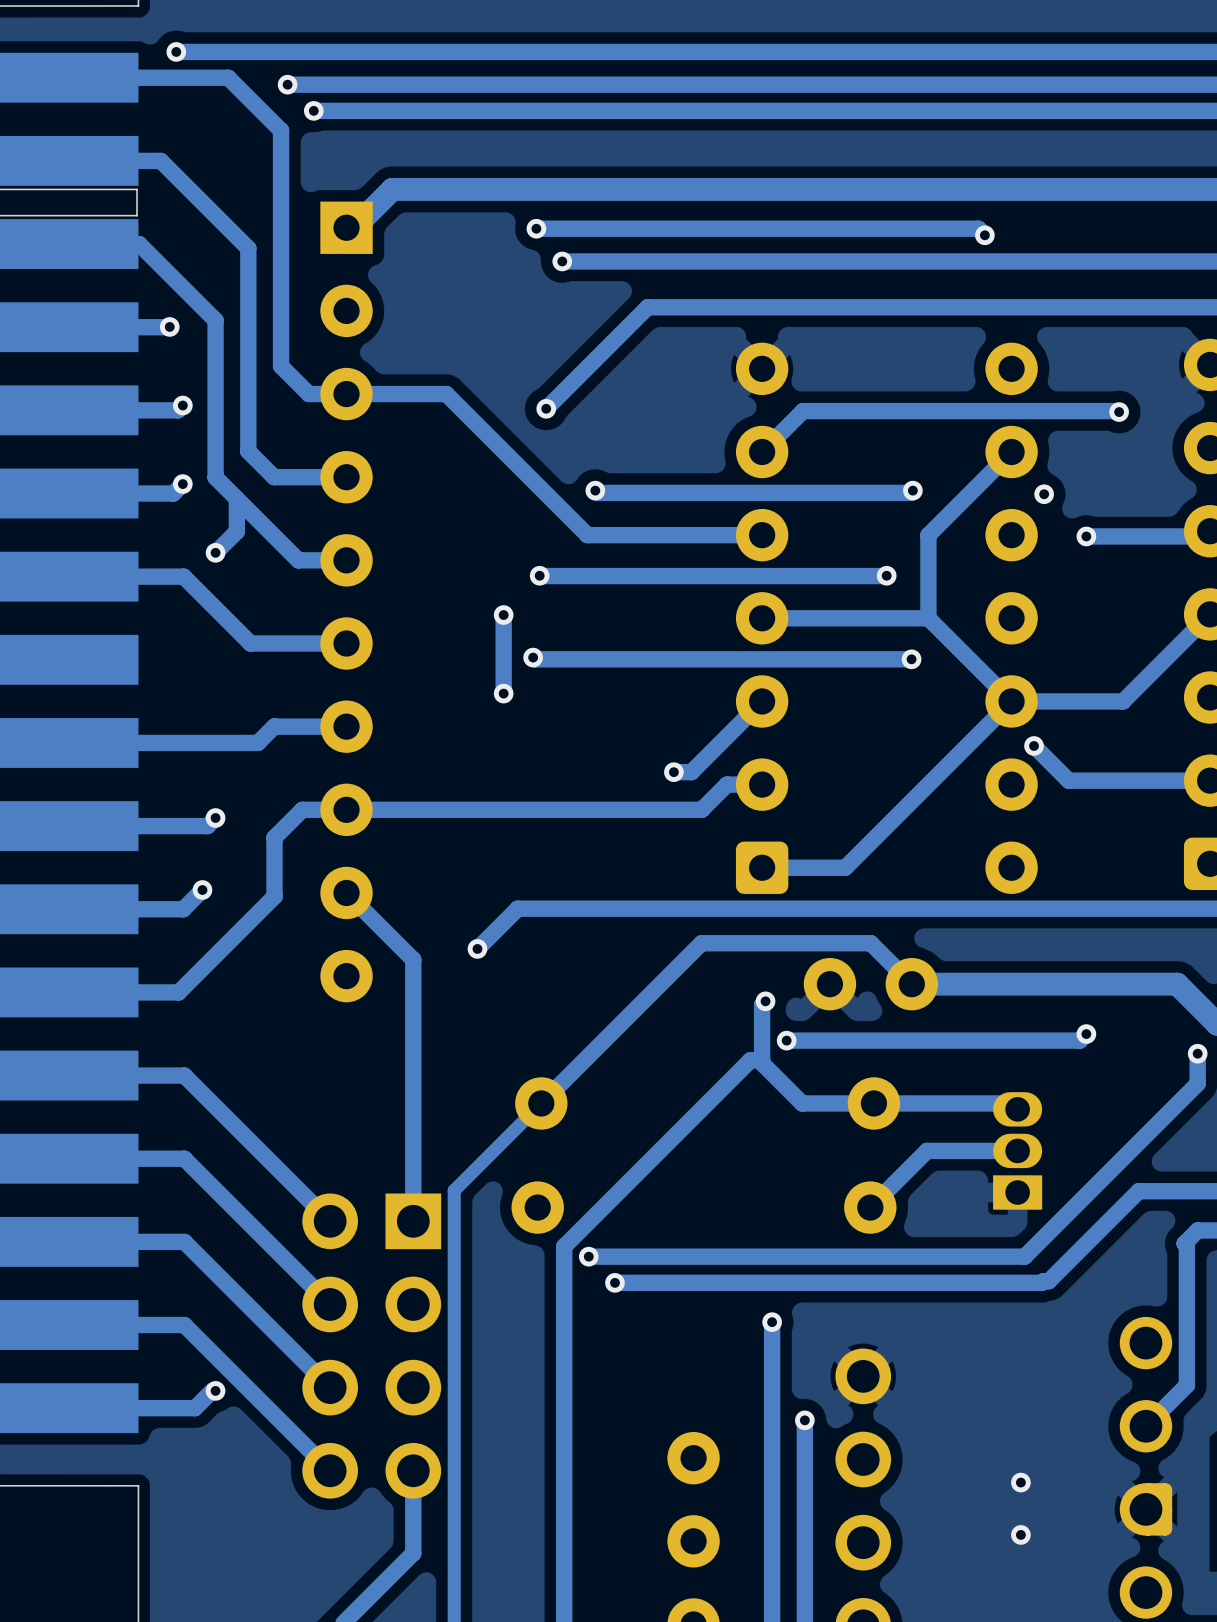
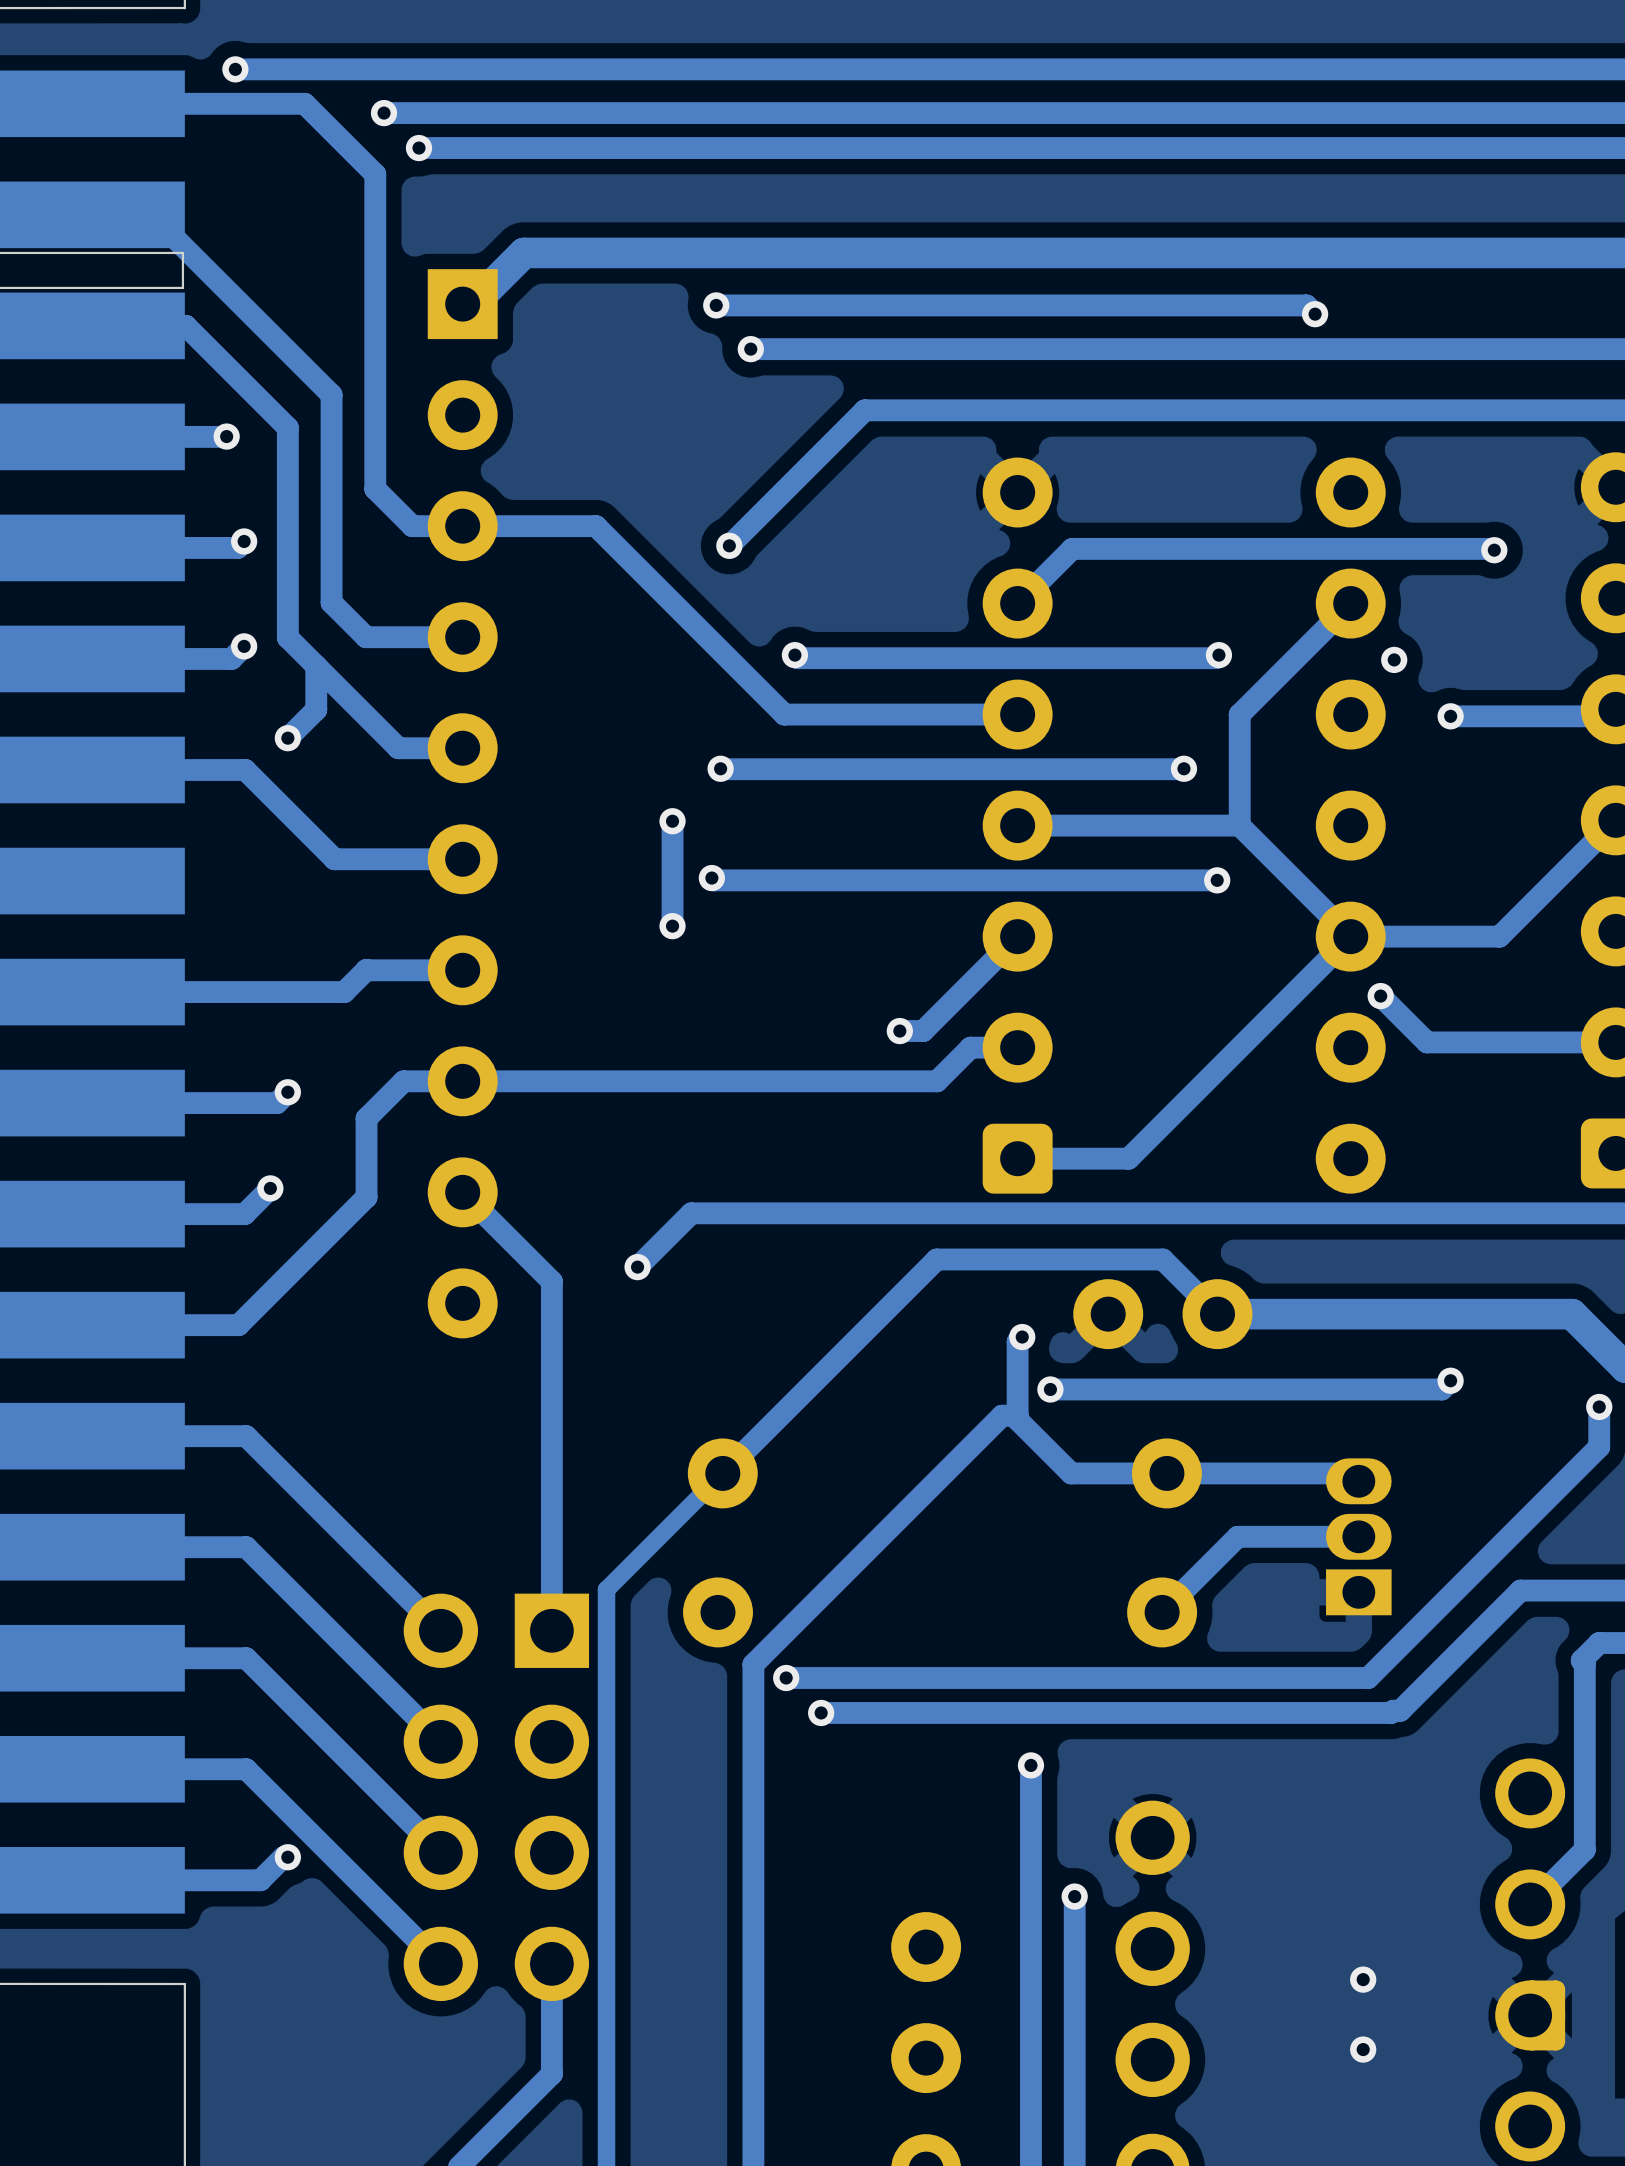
track: (113, 160) (160, 160) (248, 248) (248, 295) -> (151, 214) (331, 394)

